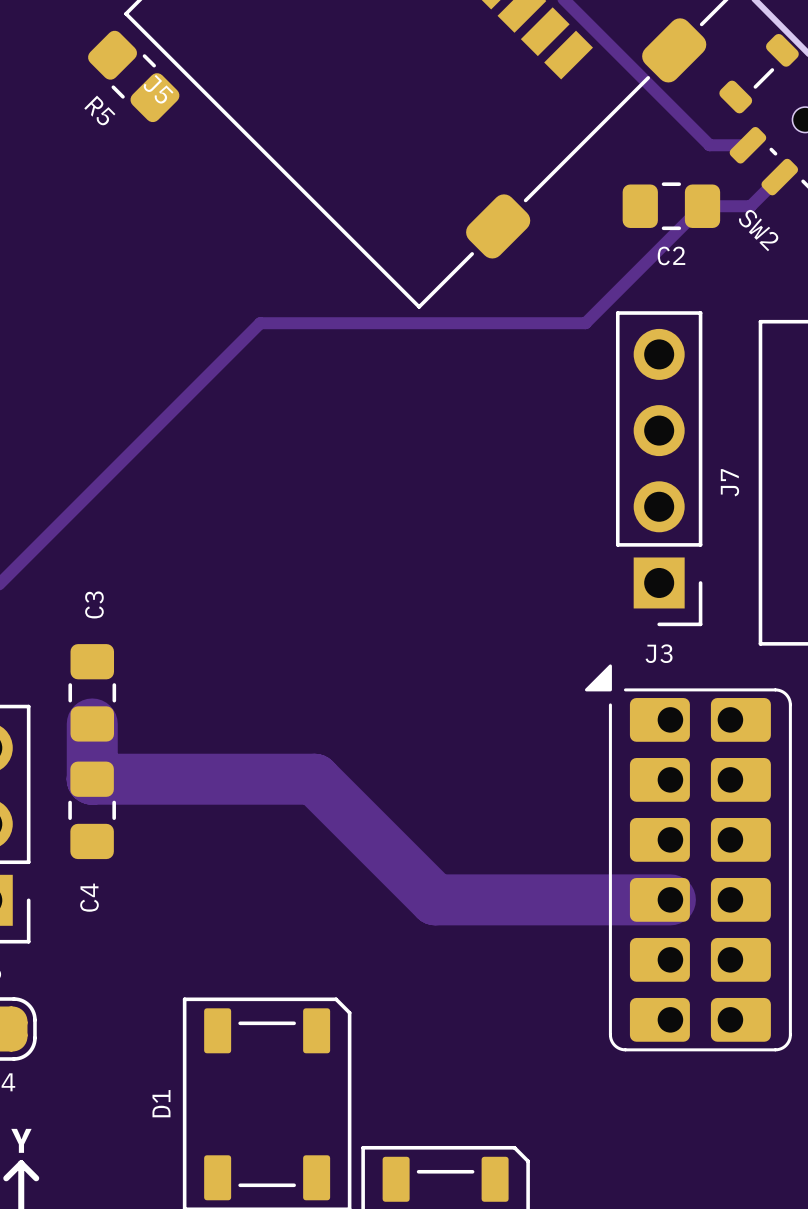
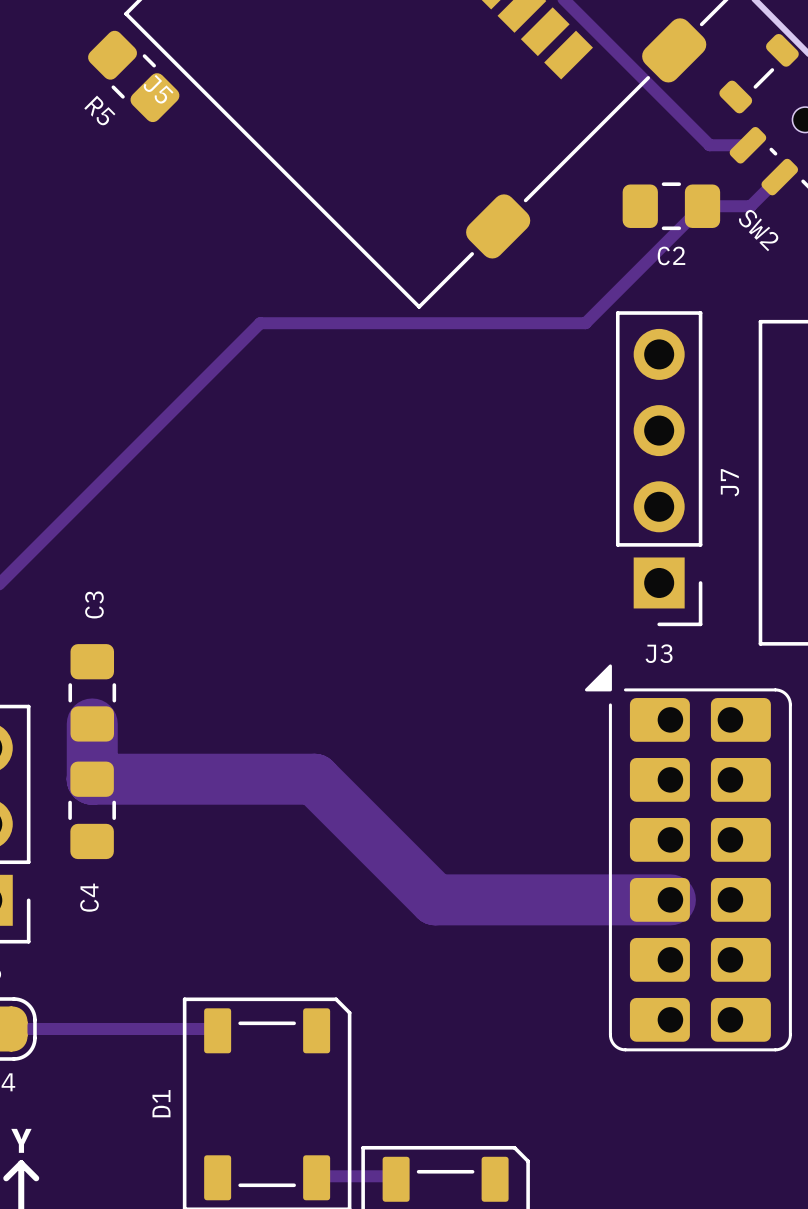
track: none -> (12, 1029) (217, 1029)
track: none -> (316, 1176) (393, 1176) (396, 1179)

